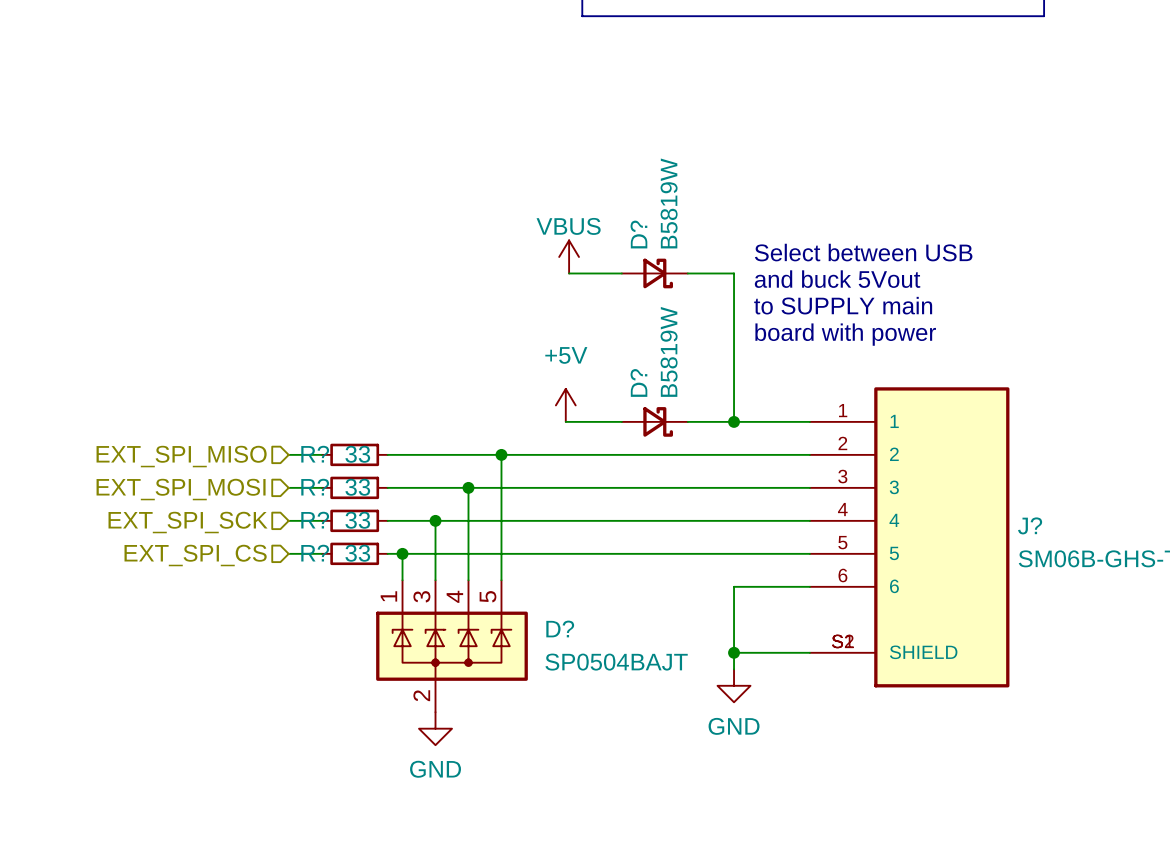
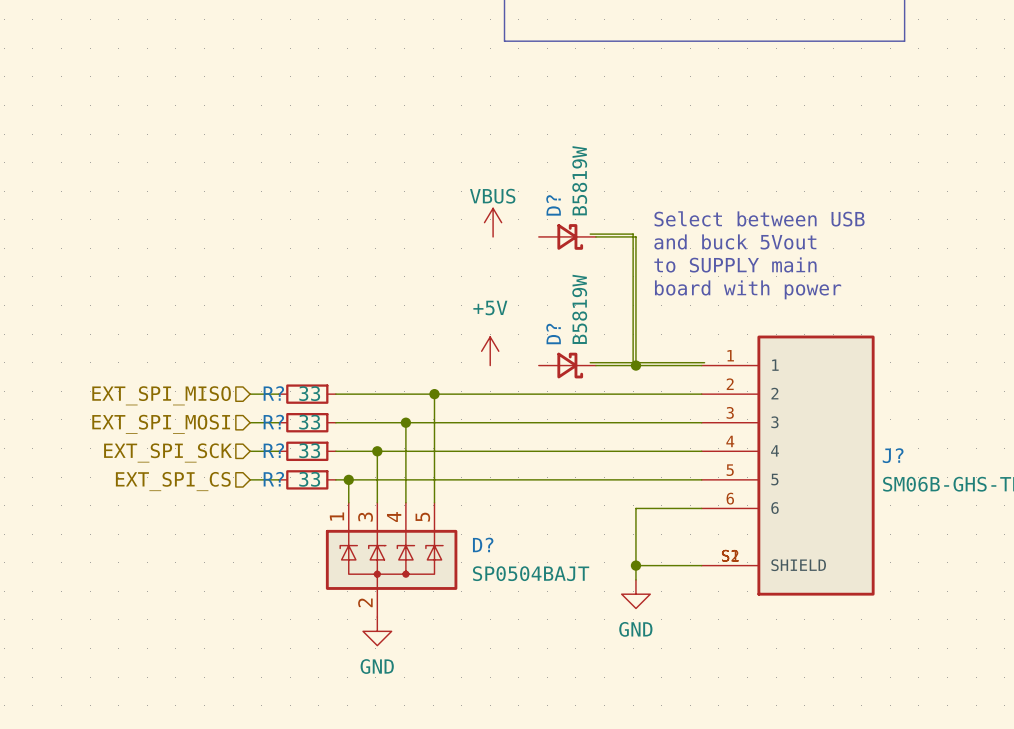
line: (582, 16) (1044, 16) -> (504, 14) (504, 41) (904, 41) (904, 14)
wire: none -> (590, 234) (633, 234) (633, 362)
wire: (569, 273) (621, 273) -> none
wire: none -> (590, 362) (704, 362)
wire: (565, 421) (621, 421) -> none

